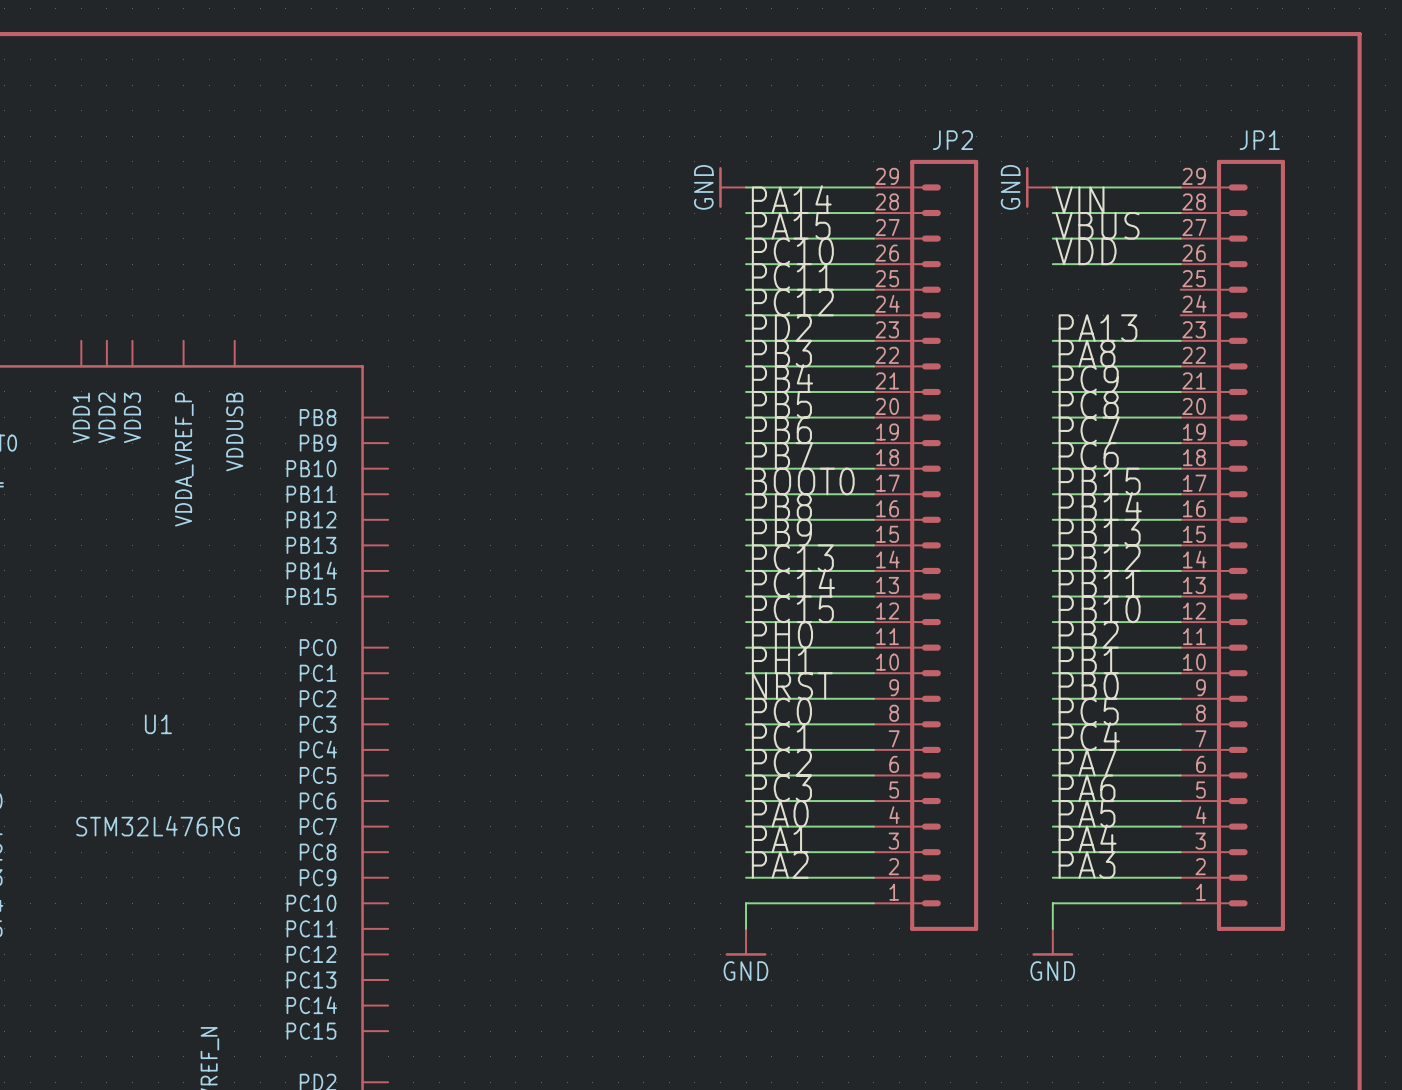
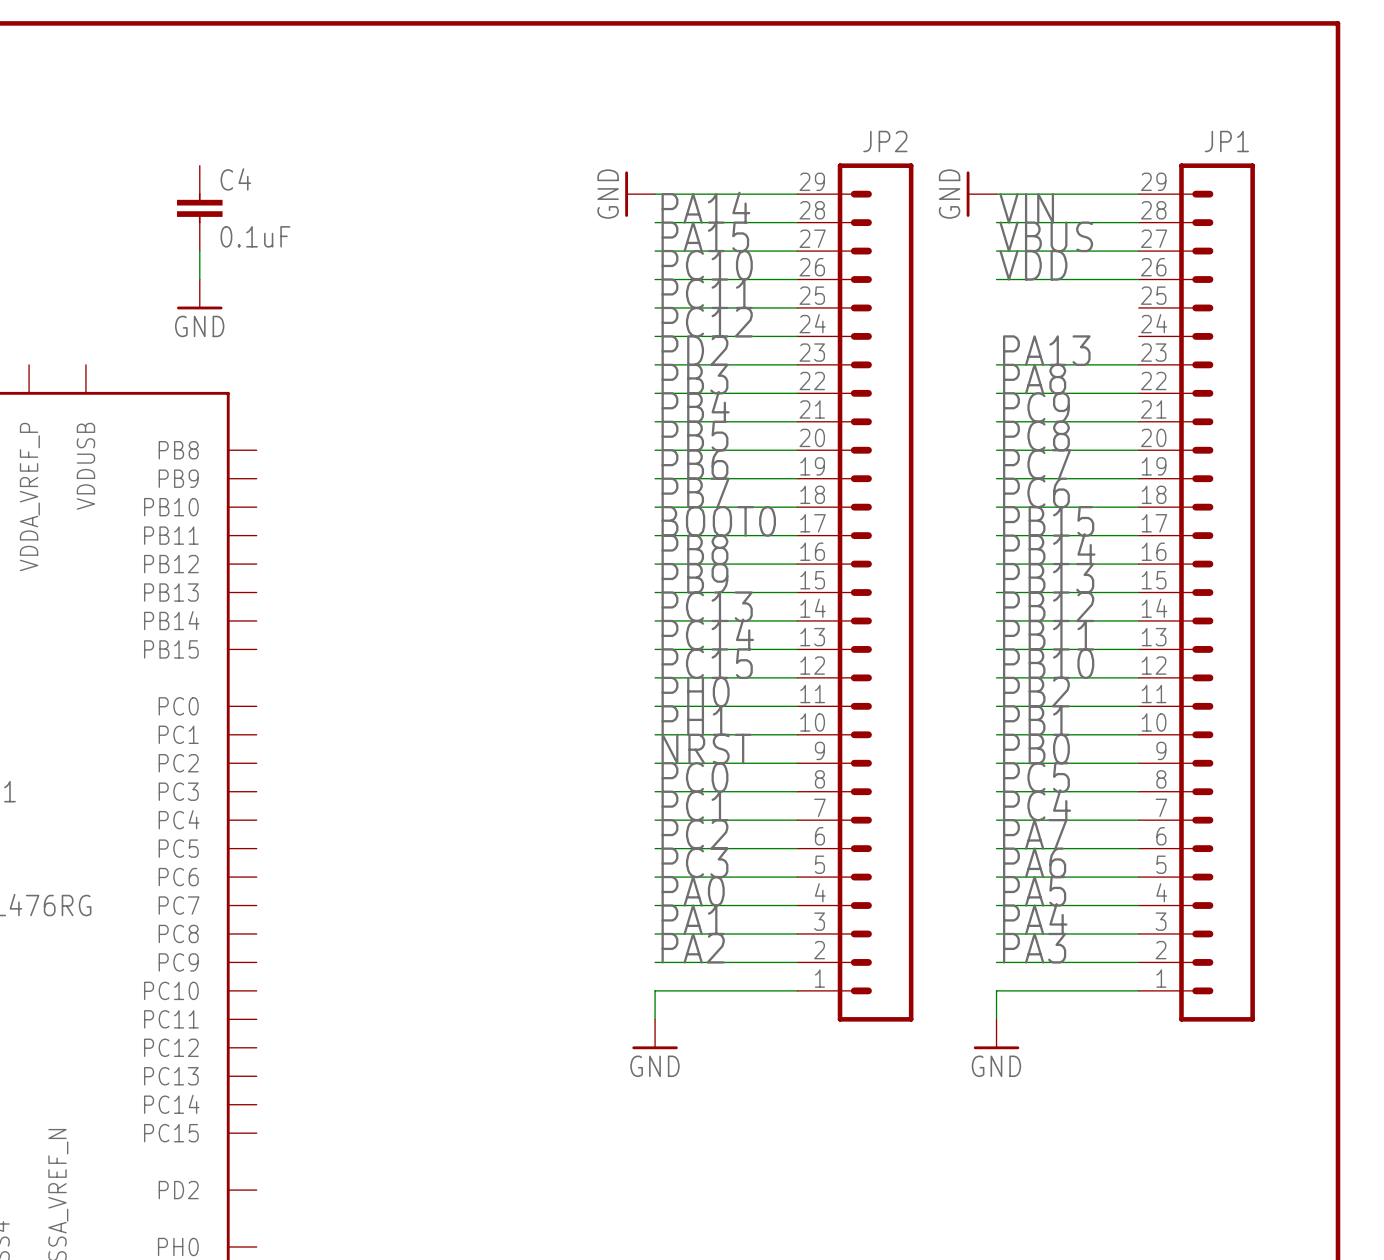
C4: none -> 0.1uF (199, 208)
wire: none -> (199, 251) (199, 279)
power symbol: none -> GND (199, 294)

